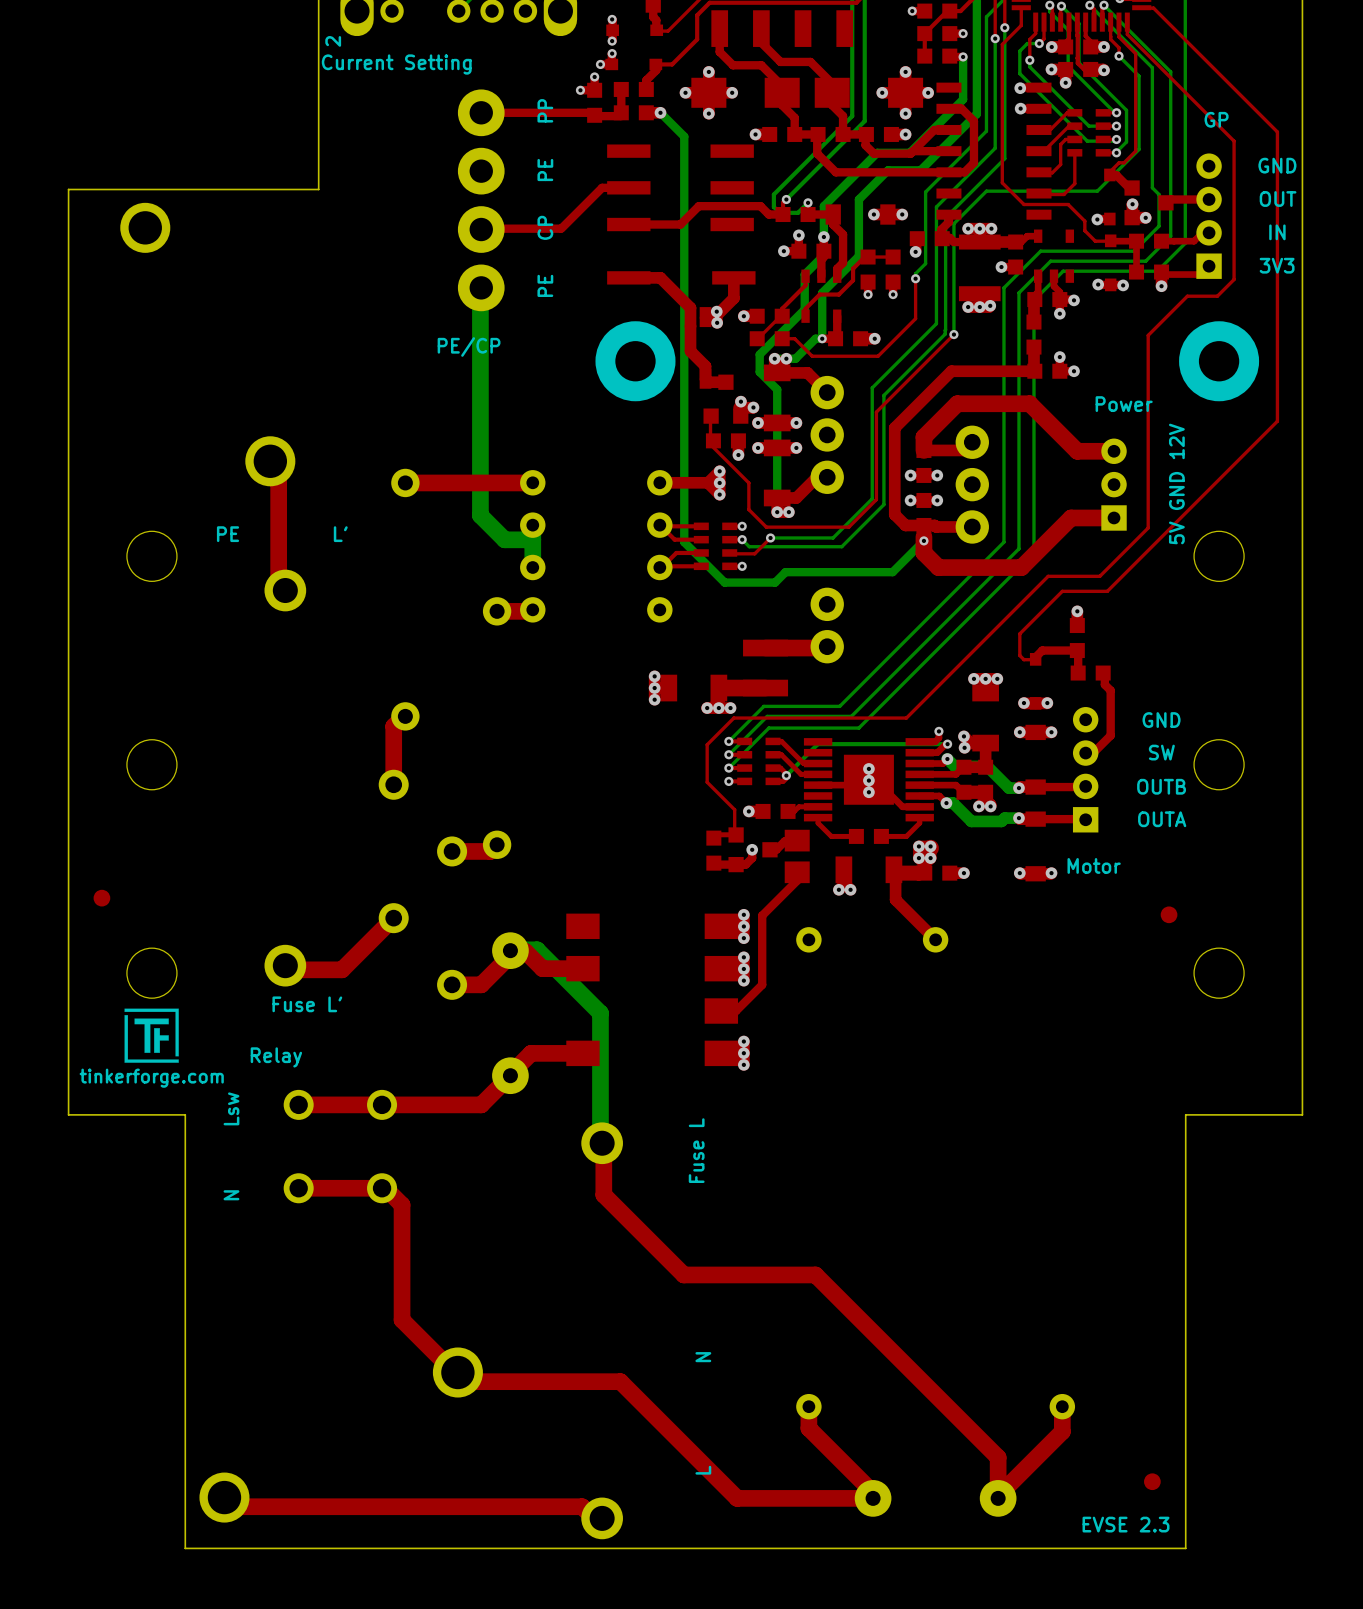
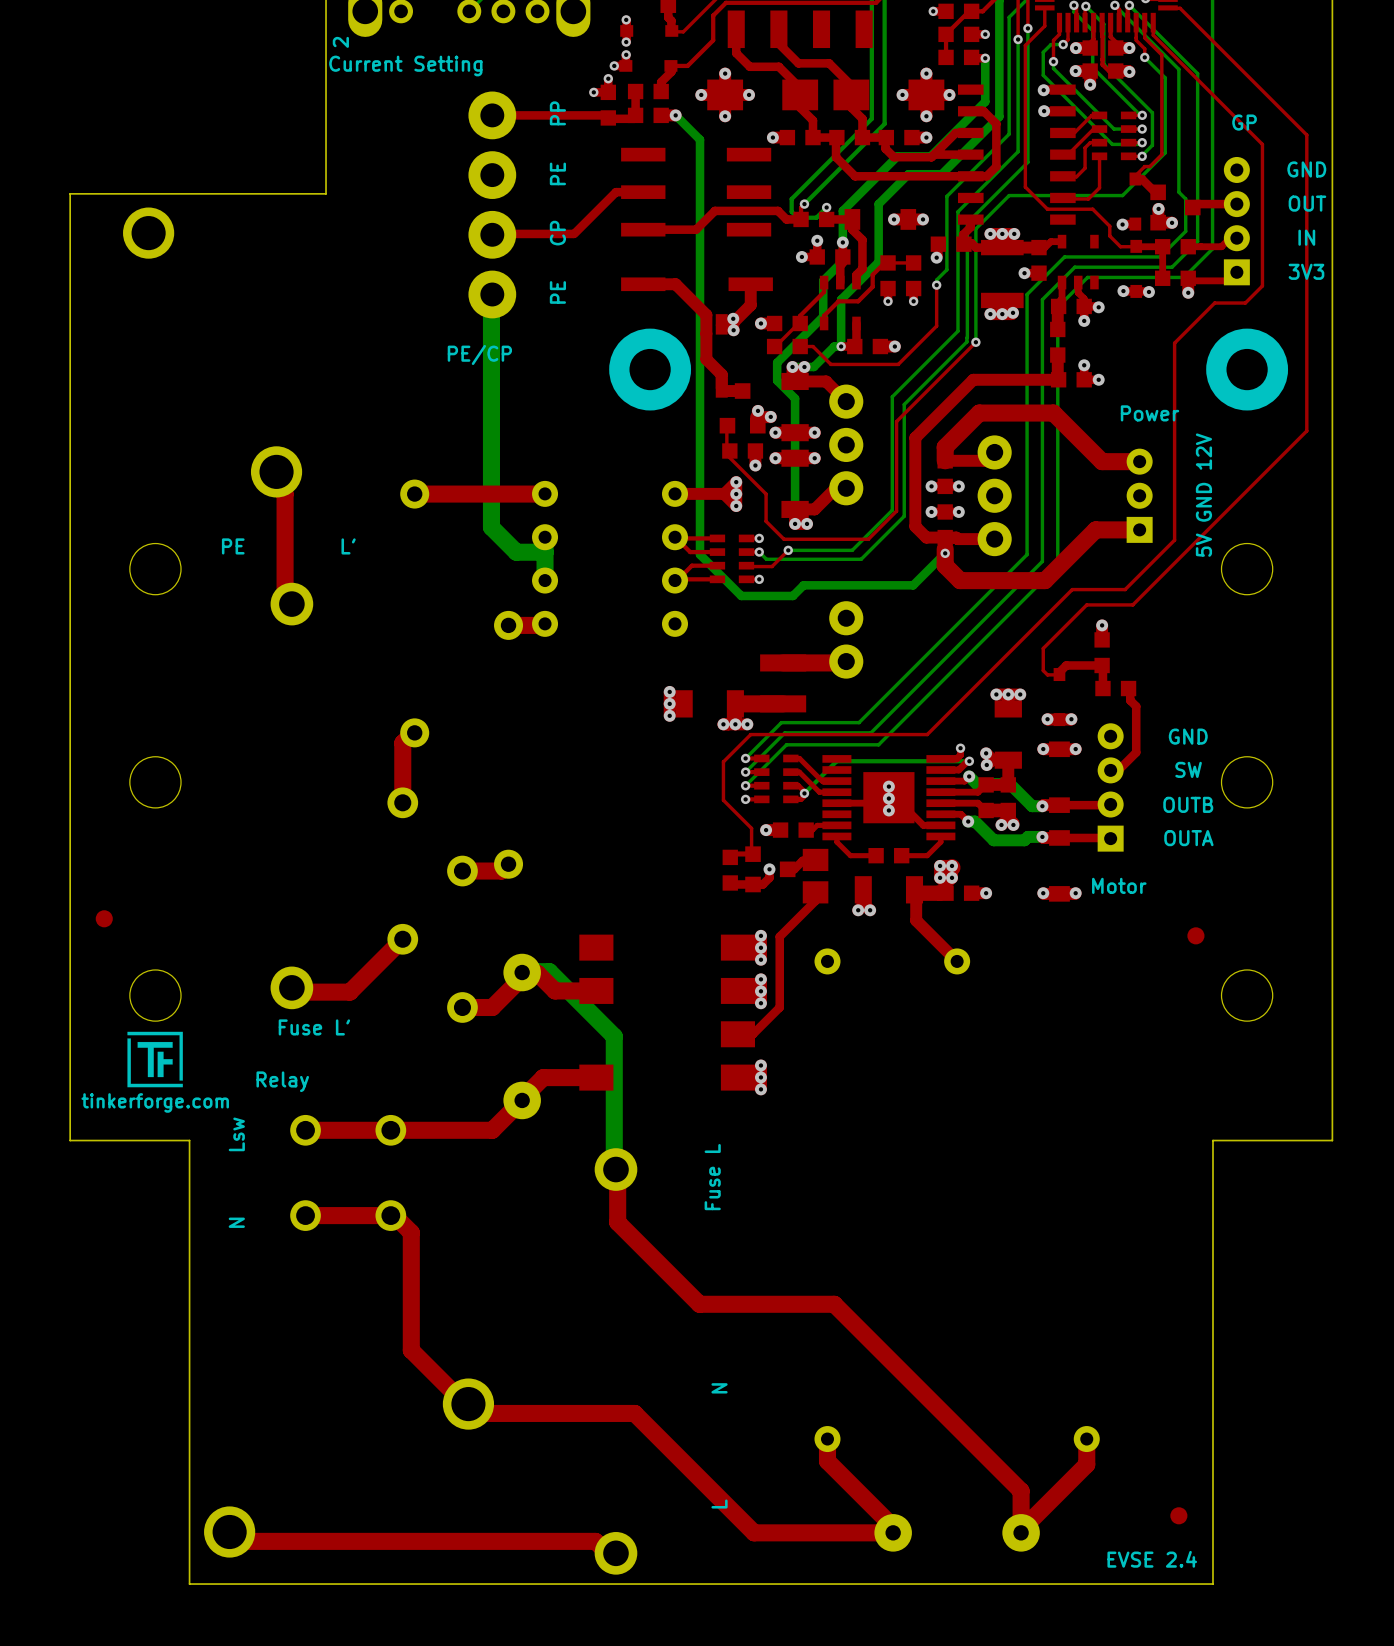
text: EVSE 2.3 (1126, 1524) -> EVSE 2.4 (1152, 1559)

